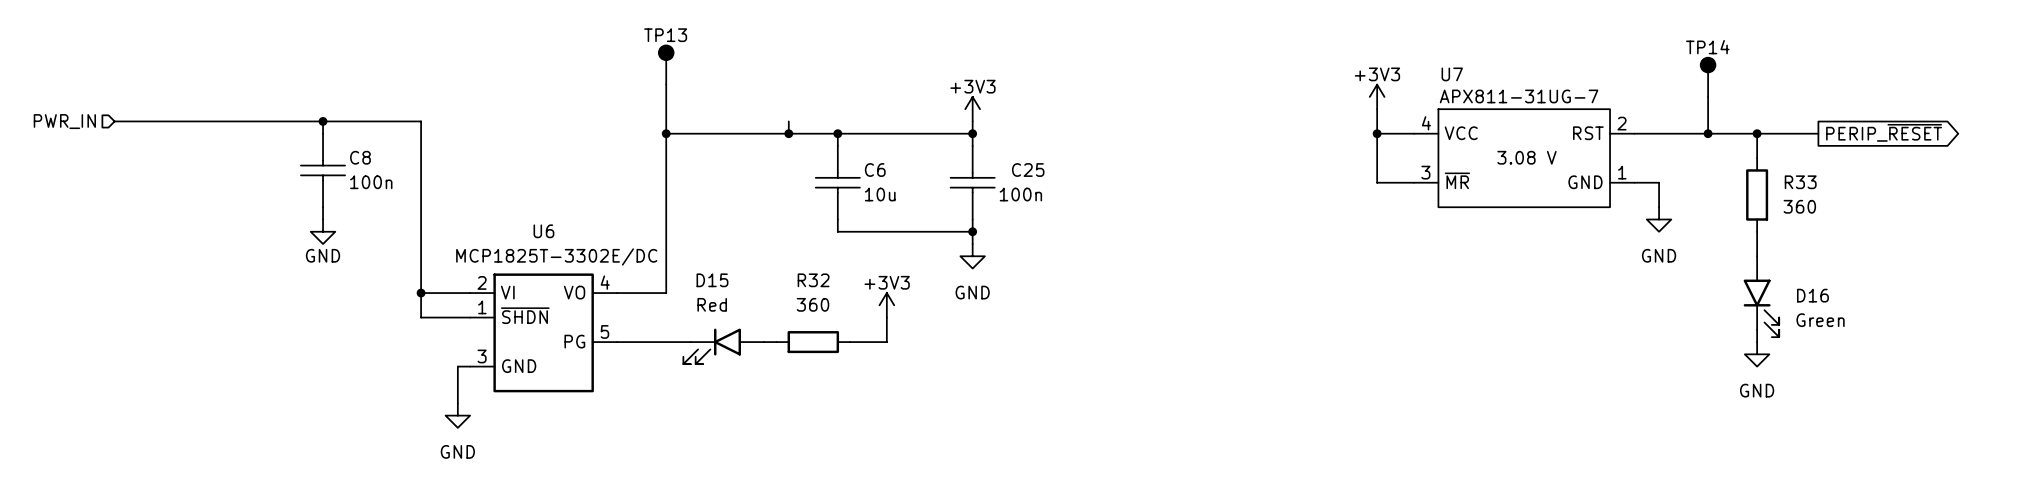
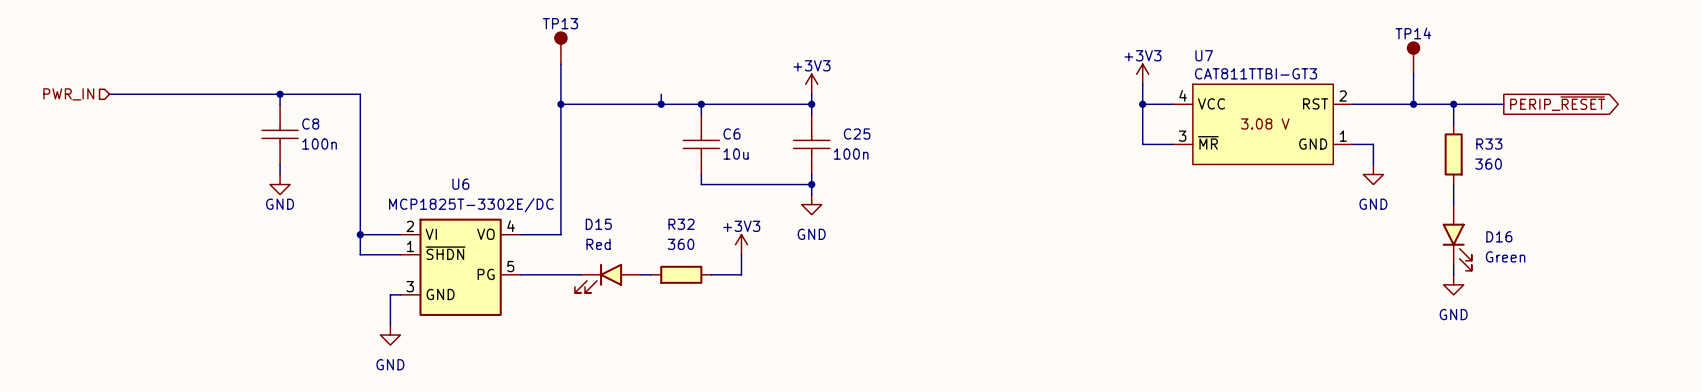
U7 value: APX811-31UG-7 (1519, 96) -> CAT811TTBI-GT3 (1255, 73)

